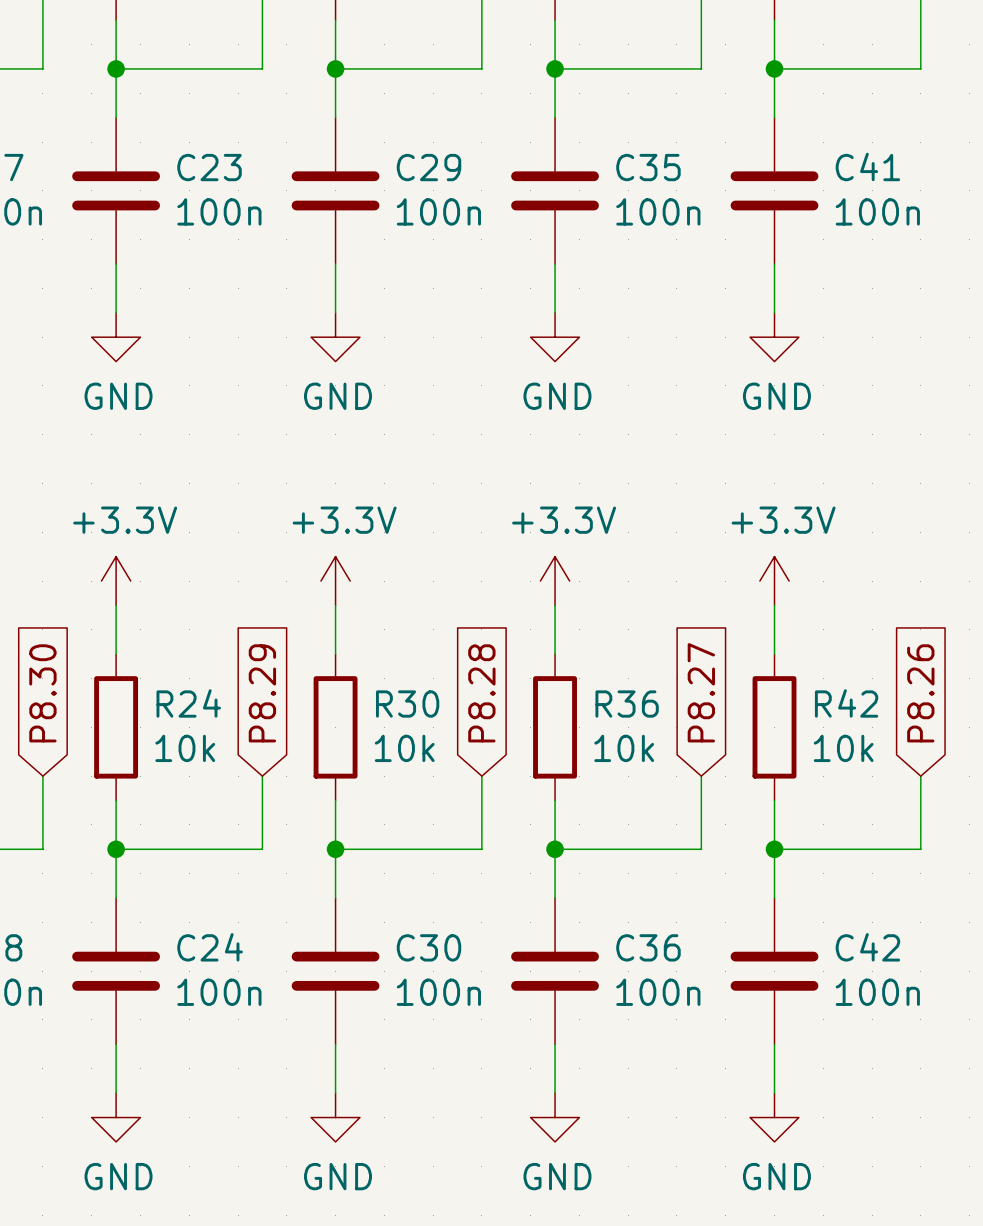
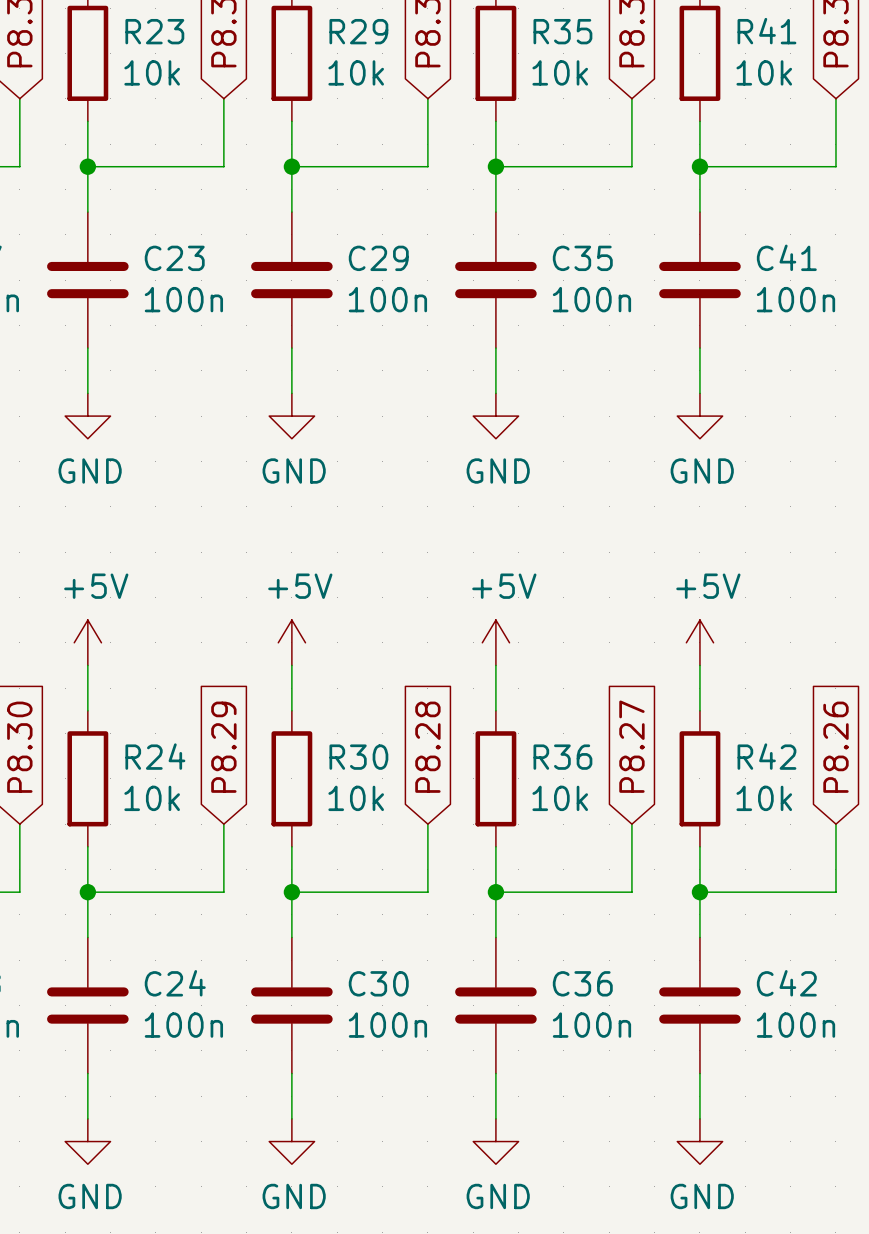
power symbol: +3.3V (116, 581) -> +5V (87, 642)
power symbol: +3.3V (335, 581) -> +5V (291, 642)
power symbol: +3.3V (555, 581) -> +5V (495, 642)
power symbol: +3.3V (774, 581) -> +5V (699, 642)

